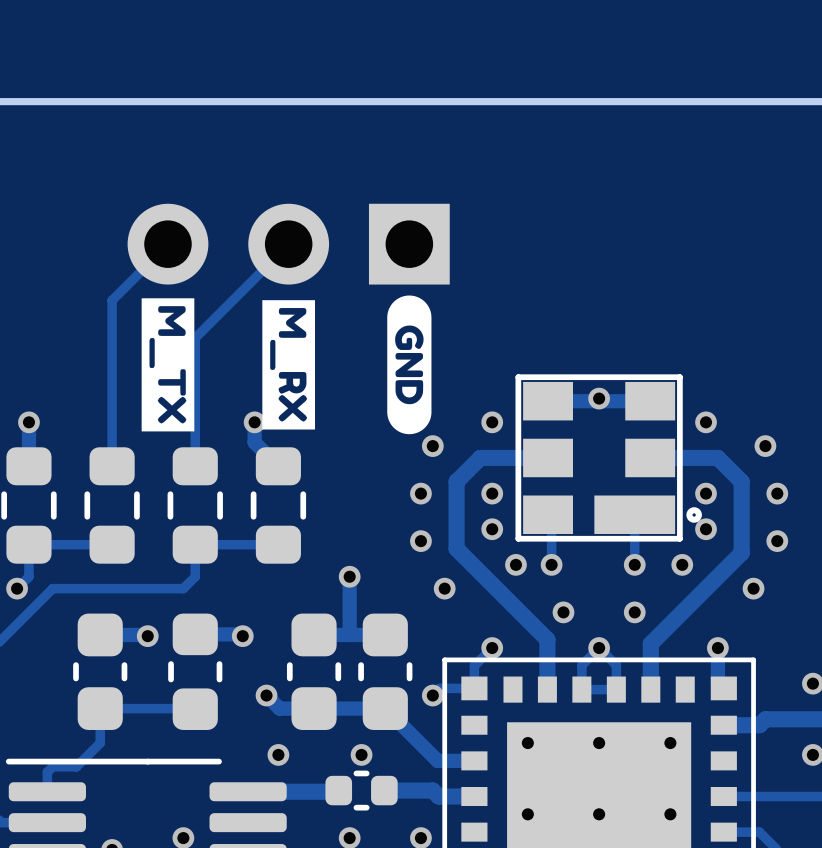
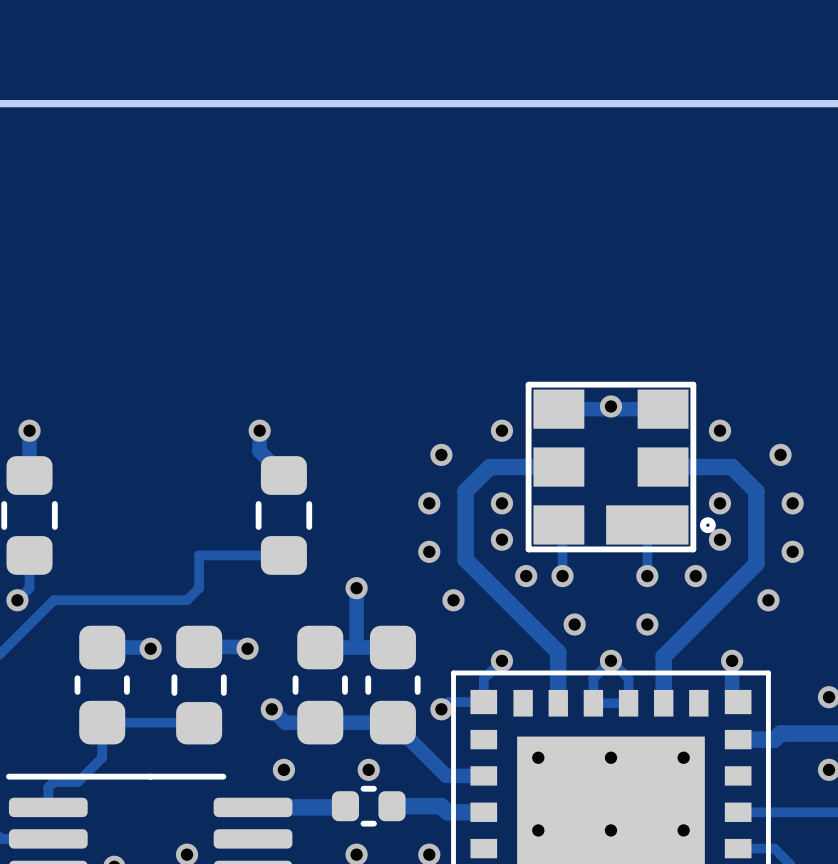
track: (168, 244) (112, 300) (112, 466) -> none
part: (288, 244) -> none
track: (289, 244) (195, 338) (195, 466) -> none
drawing: [387, 295, 432, 435] -> none
drawing: [141, 298, 195, 432] -> none
drawing: [262, 300, 316, 430] -> none
part: (112, 505) -> none
part: (195, 505) -> none
track: (28, 544) (112, 544) -> none

